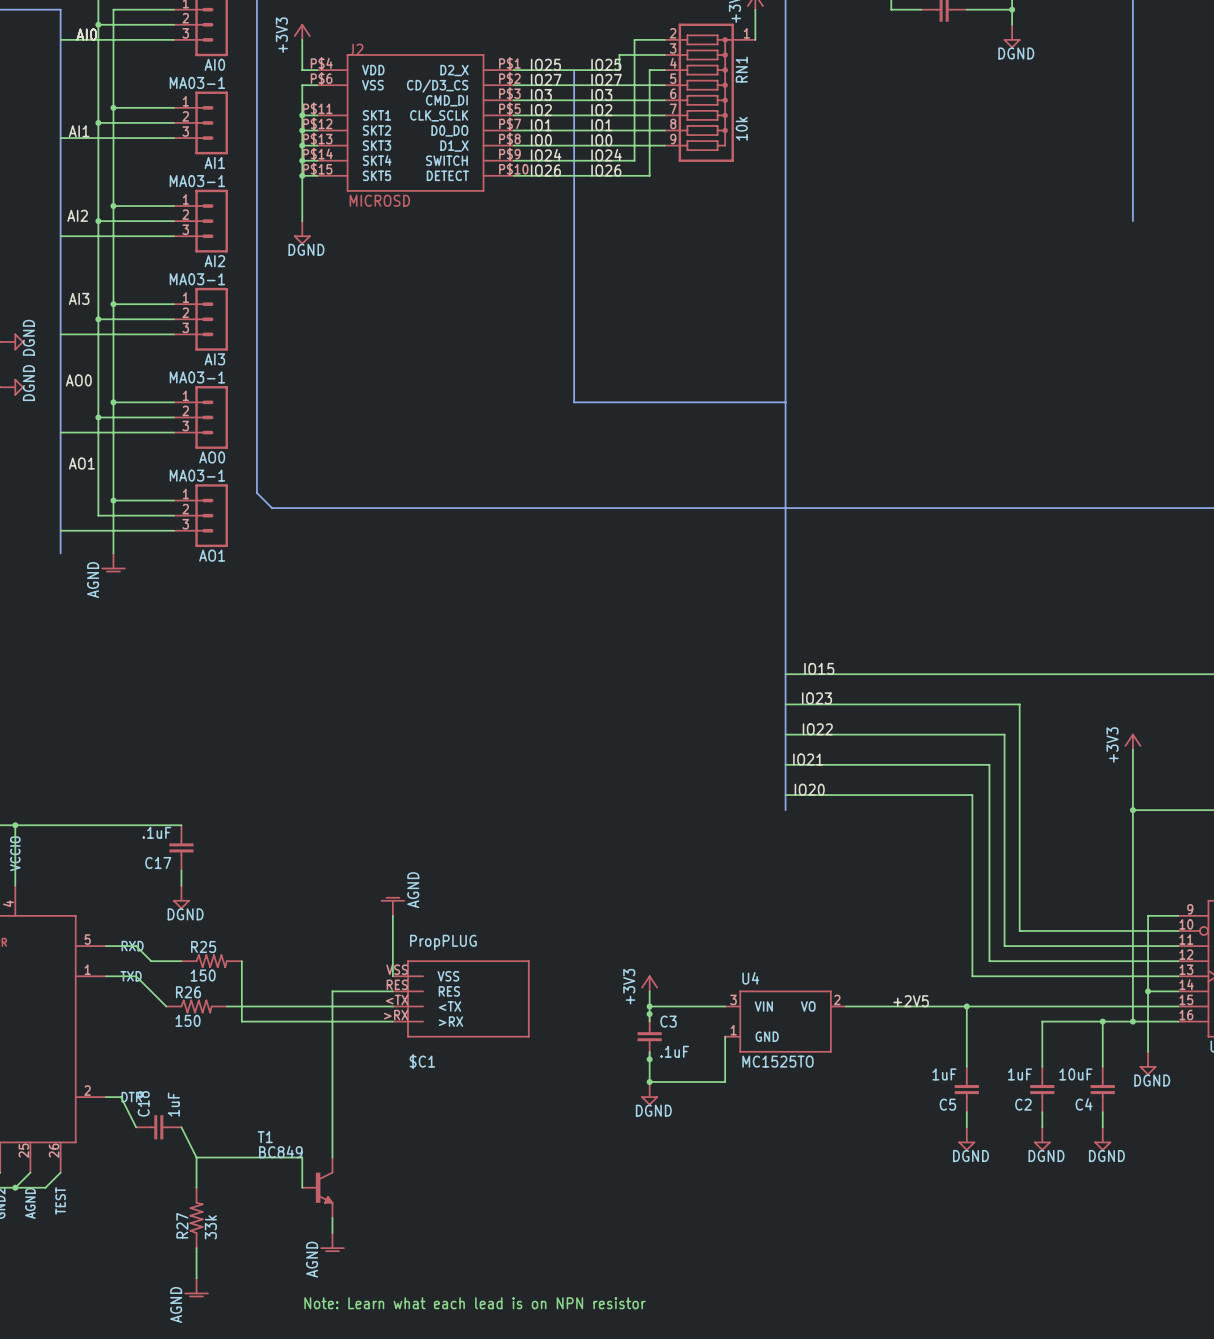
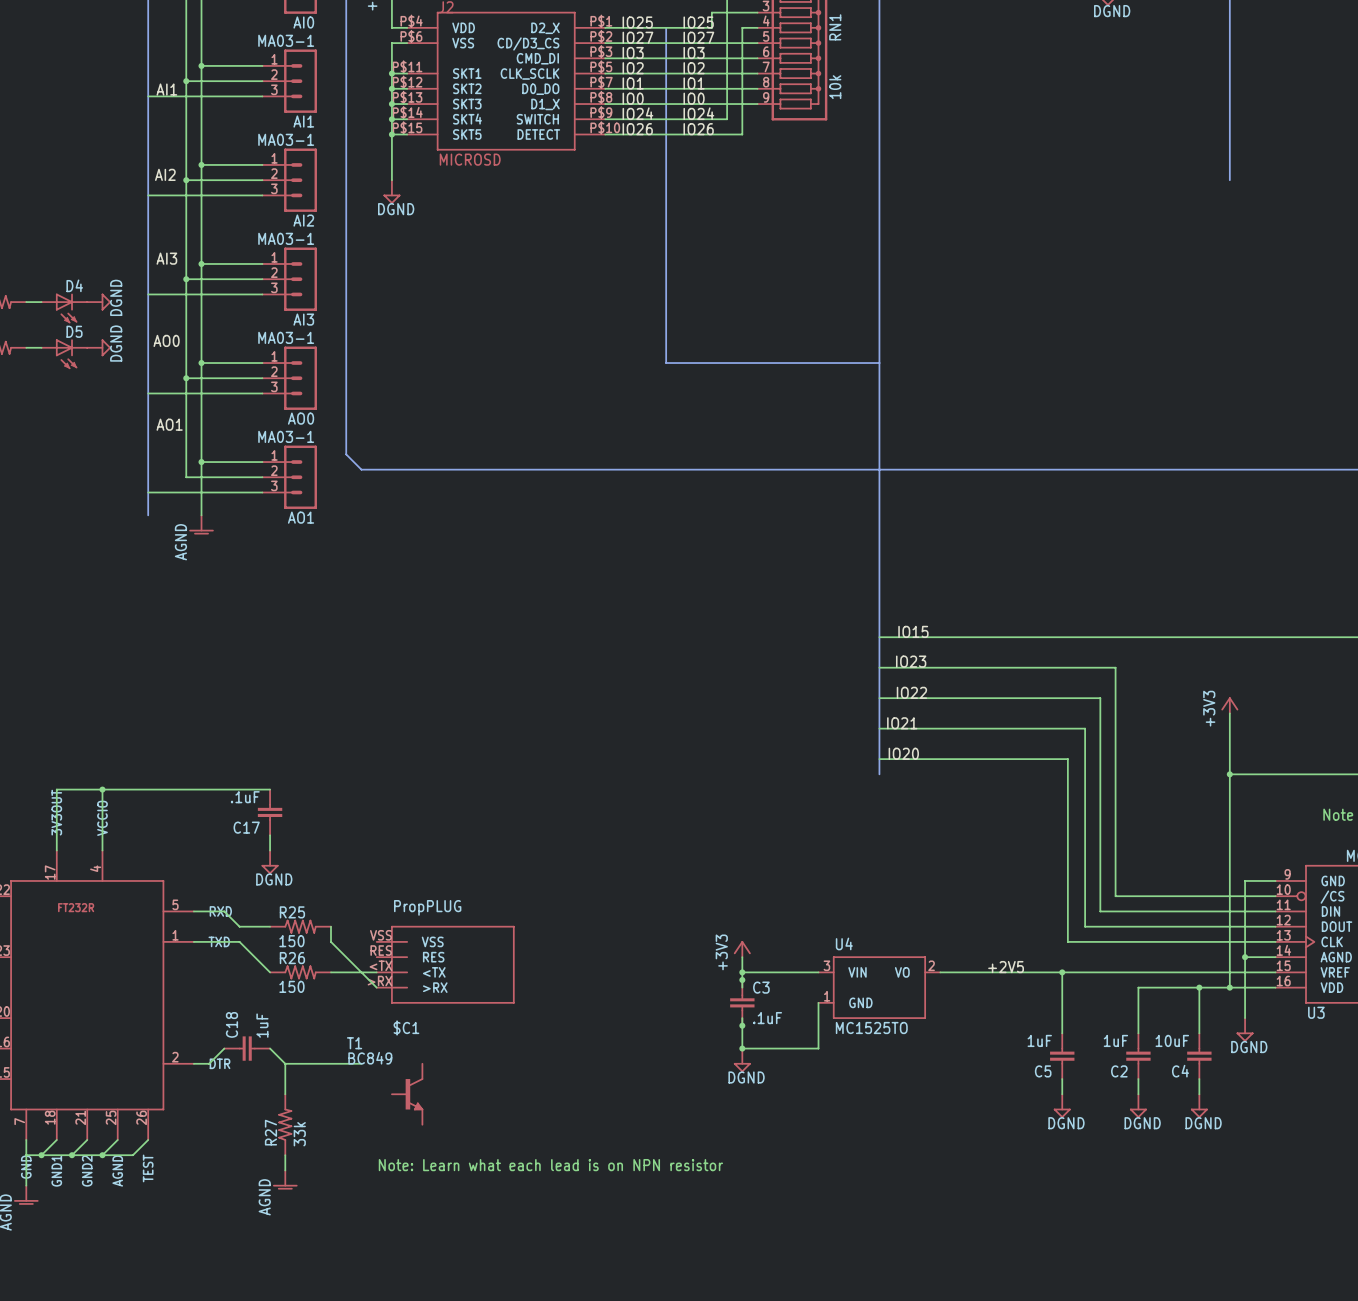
power symbol: AGND (392, 906) -> none
wire: (392, 915) (392, 976) -> none
wire: (136, 976) (166, 1006) -> (224, 941) (239, 941) (270, 972)
wire: (241, 976) (241, 1021) (392, 1021) -> (331, 941) (376, 987)
wire: (392, 991) (332, 991) (332, 1157) -> none
part position: (461, 998) -> (445, 964)
R26 position: (196, 1006) -> (300, 972)
wire: (287, 1006) (392, 1006) -> none
wire: none -> (270, 1048) (285, 1063)
wire: (121, 1097) (136, 1127) -> (209, 1063) (224, 1048)
wire: none -> (285, 1063) (285, 1094)
wire: none -> (285, 1063) (361, 1063)
C18 position: (158, 1127) -> (247, 1048)
wire: (181, 1127) (196, 1157) -> none
wire: (196, 1157) (302, 1157) (302, 1187) -> none
T1 position: (317, 1187) -> (407, 1094)
power symbol: none -> AGND (285, 1179)
R27 position: (196, 1217) -> (285, 1124)
wire: (332, 1217) (332, 1233) -> none
power symbol: AGND (332, 1242) -> none
wire: (196, 1248) (196, 1278) -> none
power symbol: AGND (196, 1287) -> none
text position: Note: Learn what each lead is on NPN resistor (475, 1303) -> Note: Learn what each lead is on NPN resistor (550, 1165)

